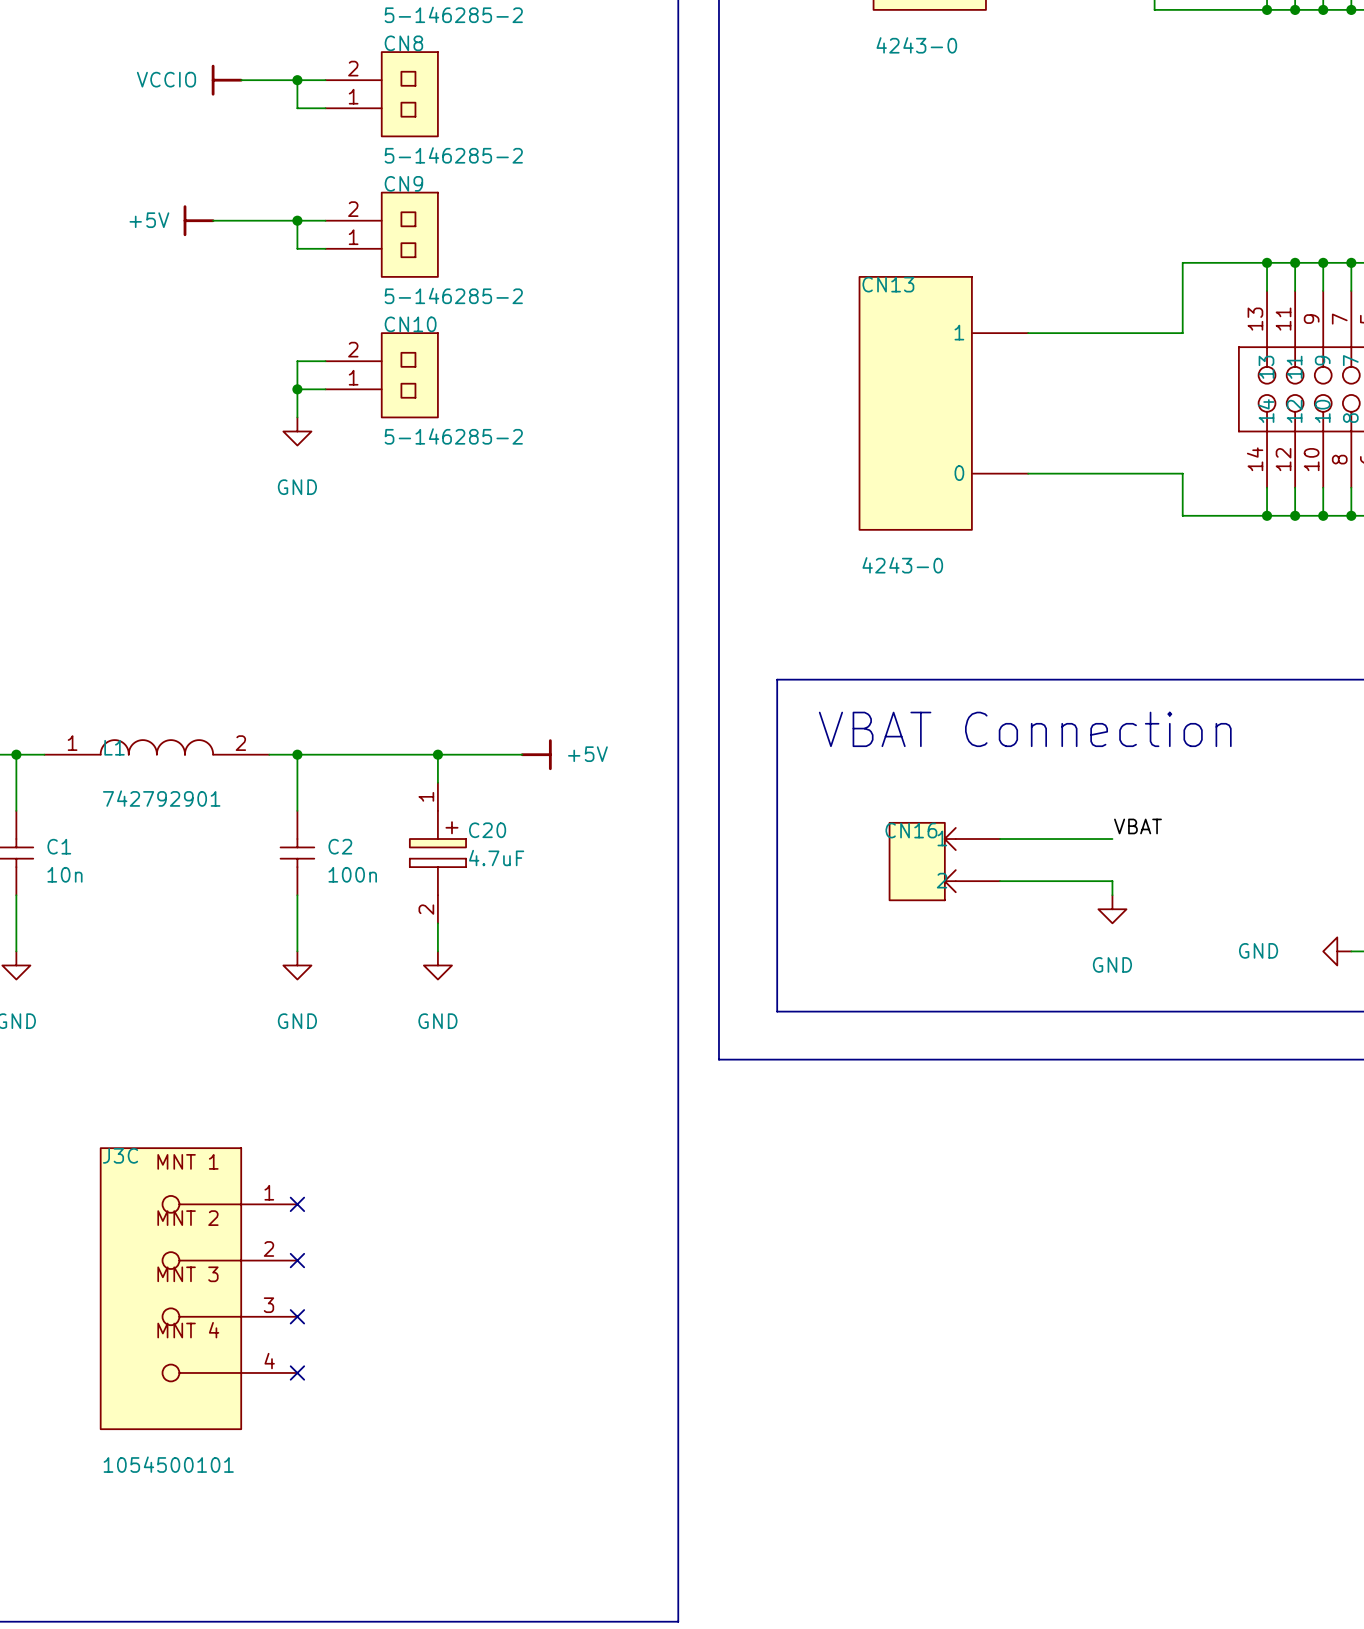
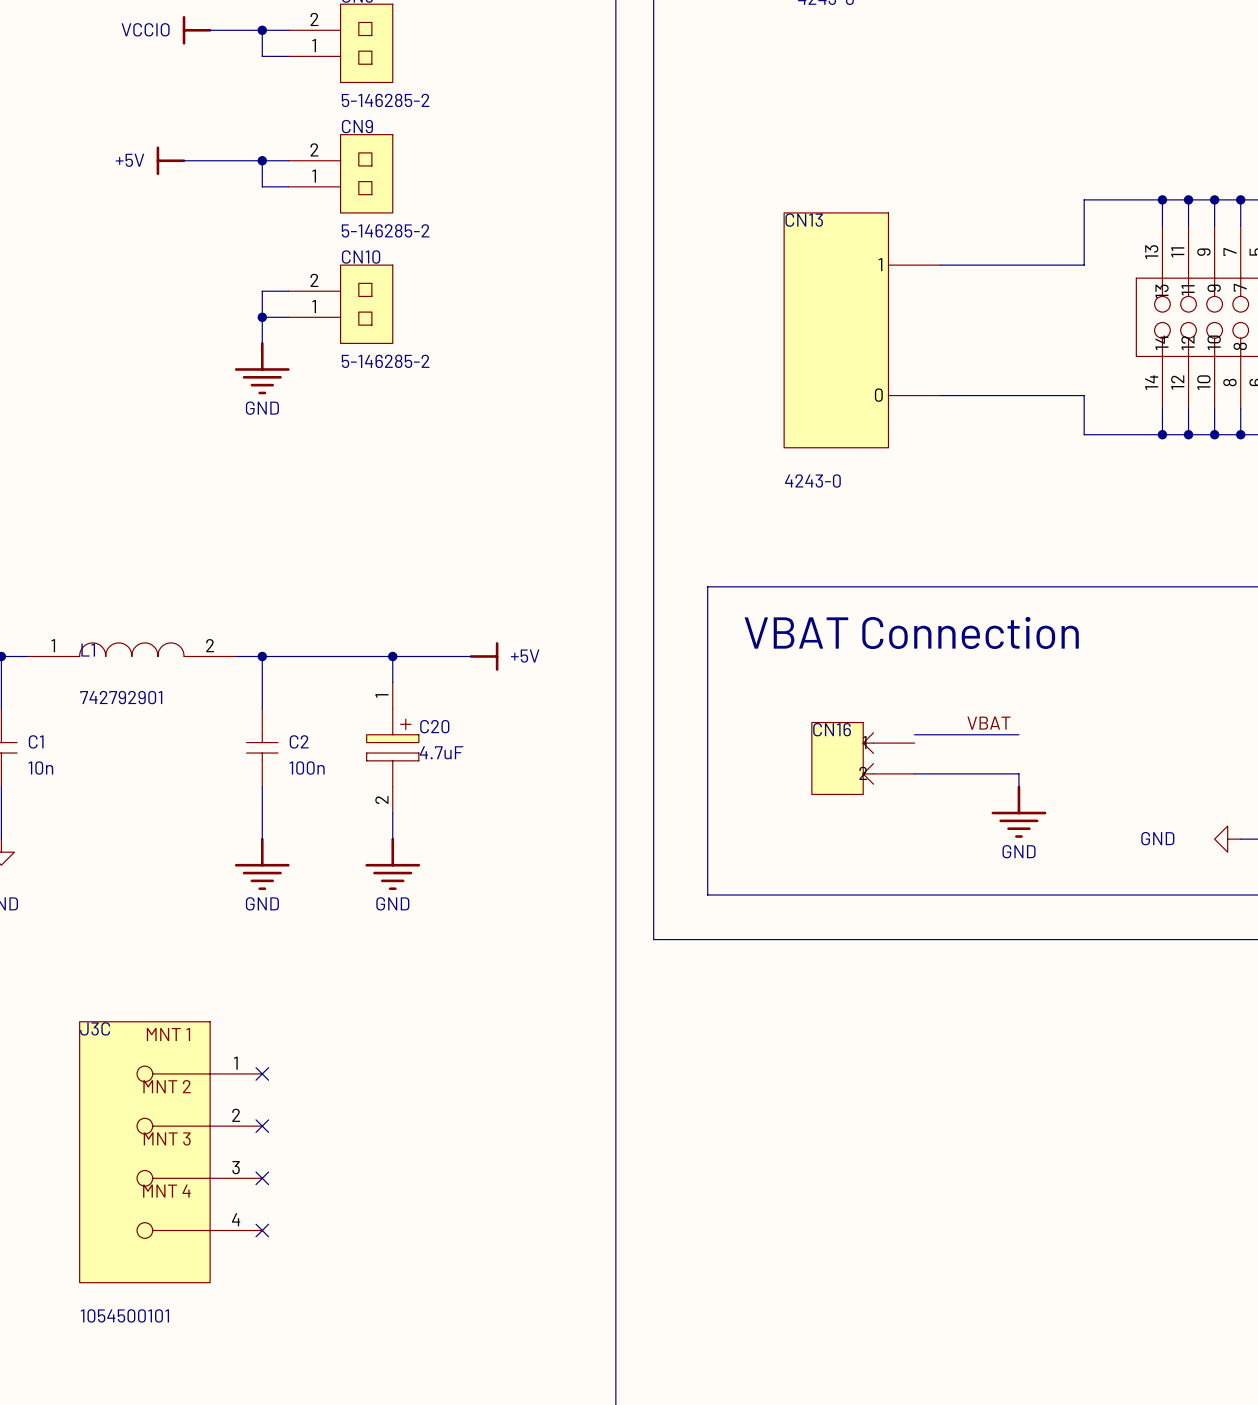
power symbol: GND (297, 431) -> none
power symbol: none -> GND (262, 368)
CN16 symbol: [889, 822, 1001, 901] -> [811, 722, 915, 795]
label position: VBAT (1137, 826) -> VBAT (988, 723)
power symbol: GND (1112, 909) -> none
power symbol: none -> GND (1018, 811)
power symbol: GND (297, 965) -> none
power symbol: GND (437, 965) -> none
power symbol: none -> GND (262, 863)
power symbol: none -> GND (392, 863)

